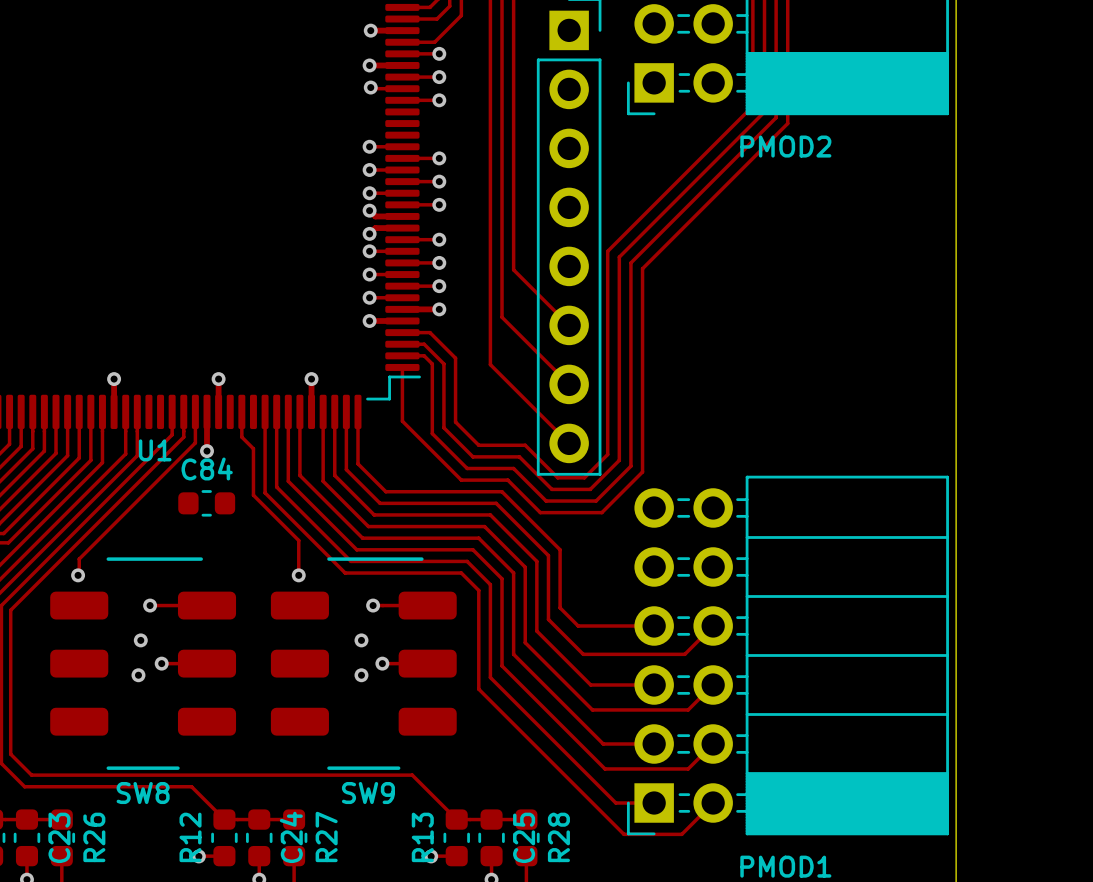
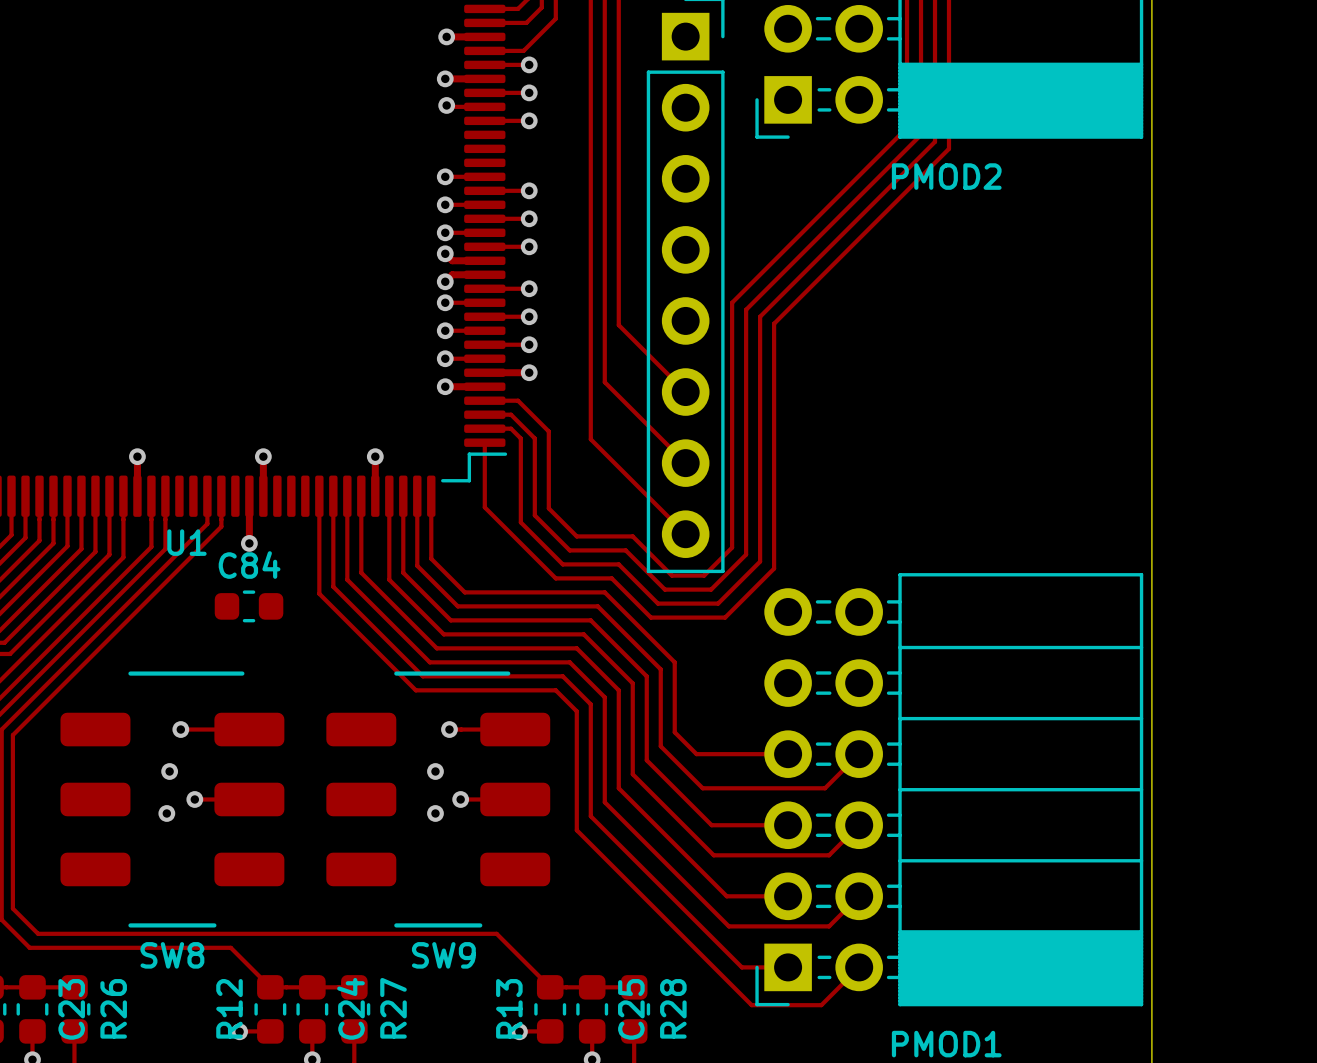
track: (195, 411) (195, 442) (79, 559) (78, 575) -> none
track: (241, 411) (241, 437) (253, 448) (253, 495) (298, 540) (298, 575) -> none
via: (78, 575) -> none
via: (298, 575) -> none

